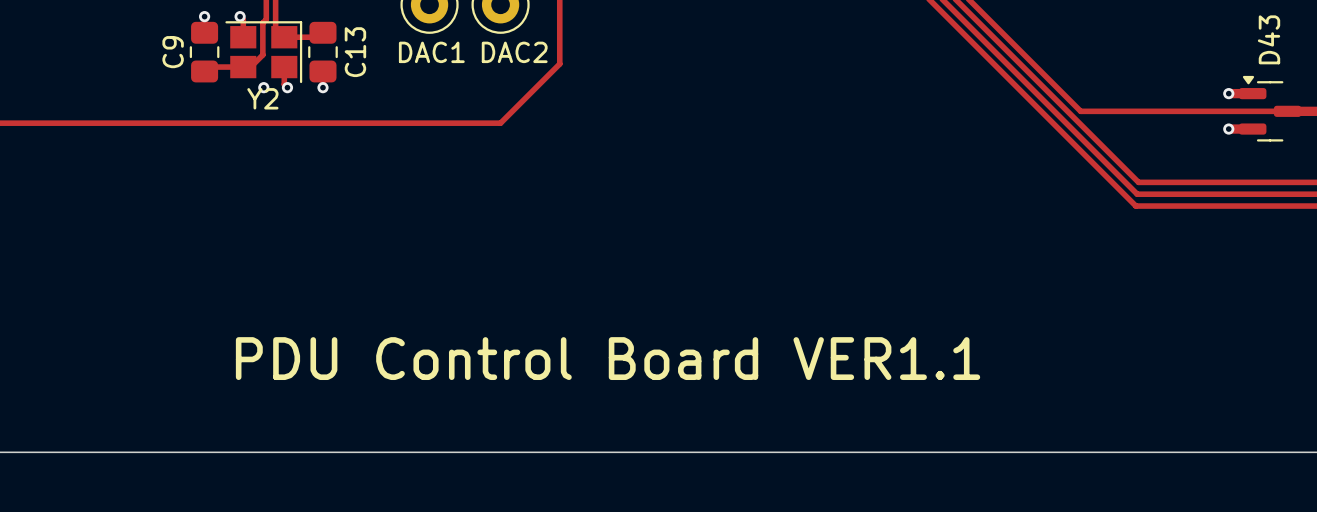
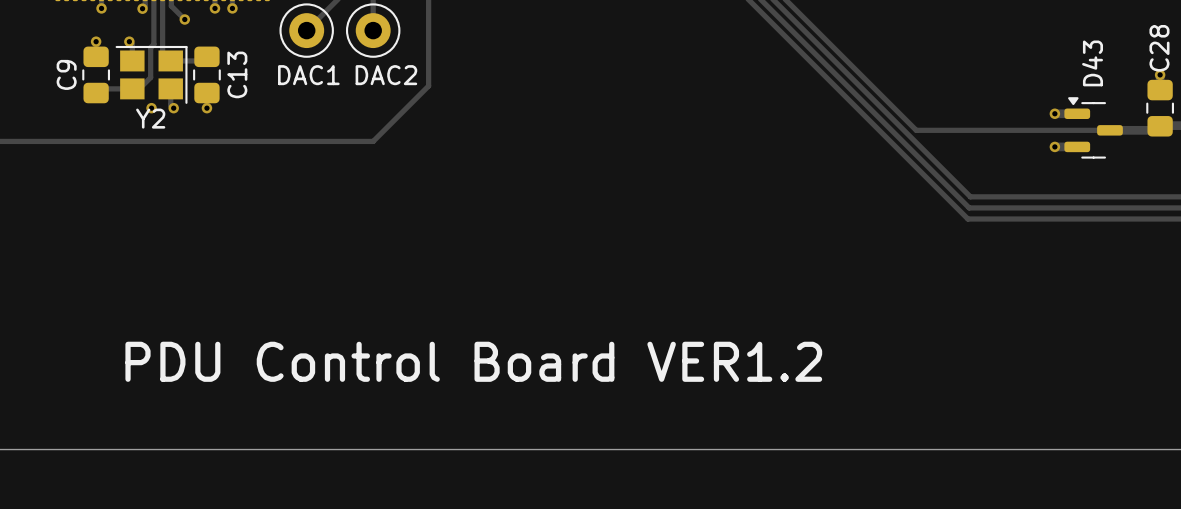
text: PDU Control Board VER1.1 (608, 358) -> PDU Control Board VER1.2 (473, 361)

